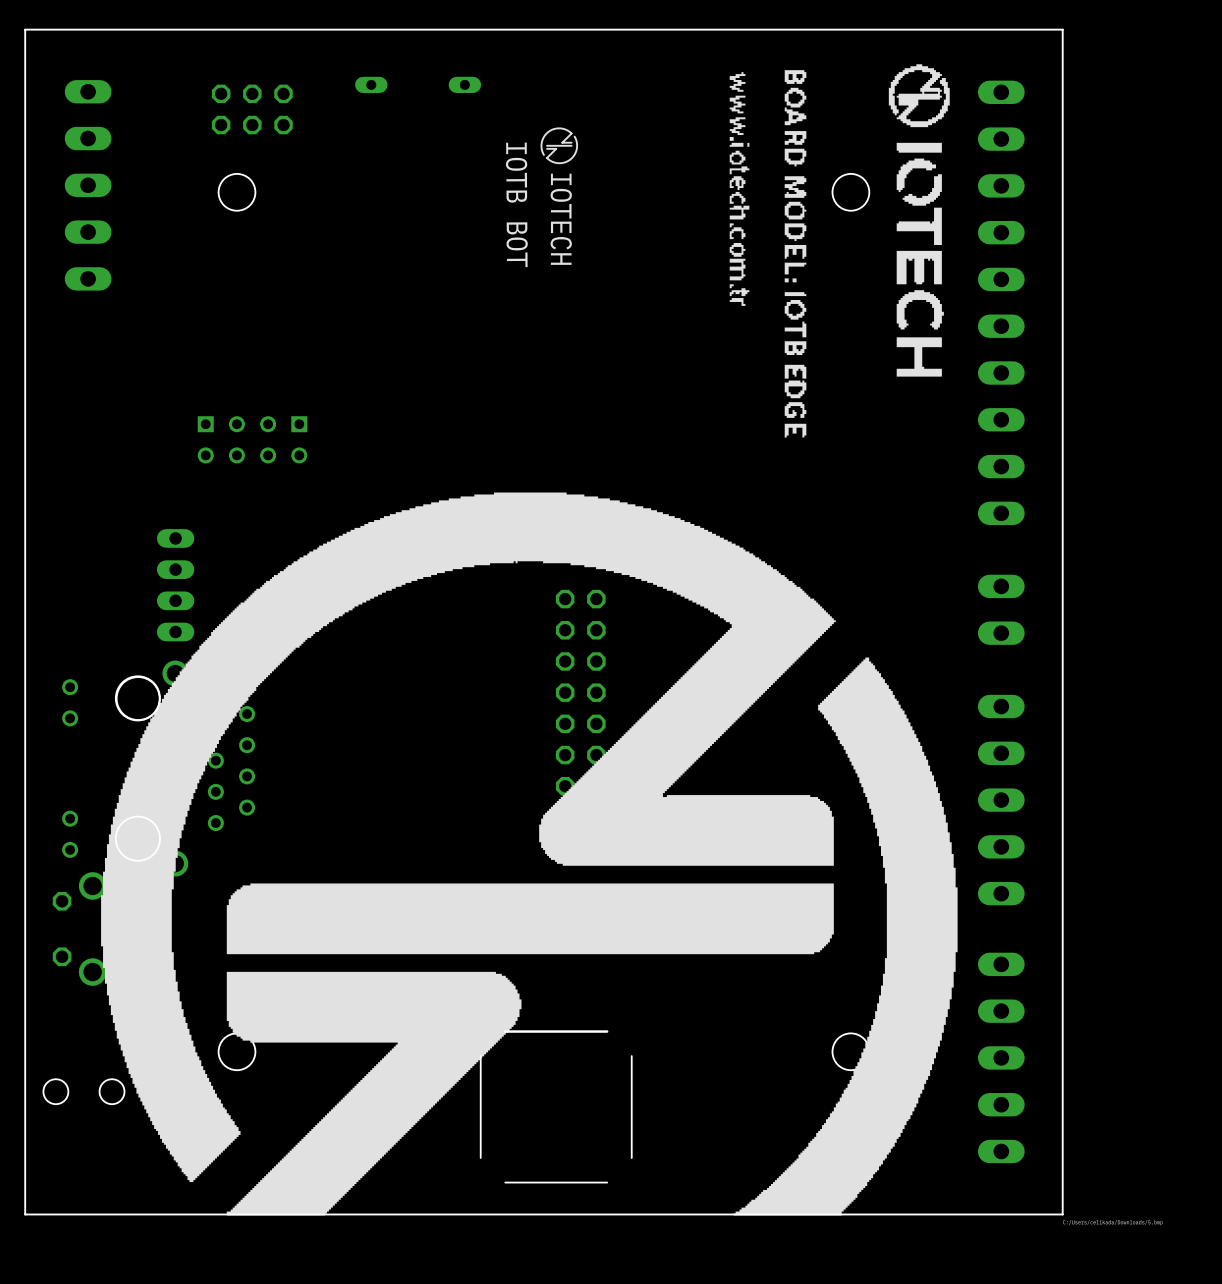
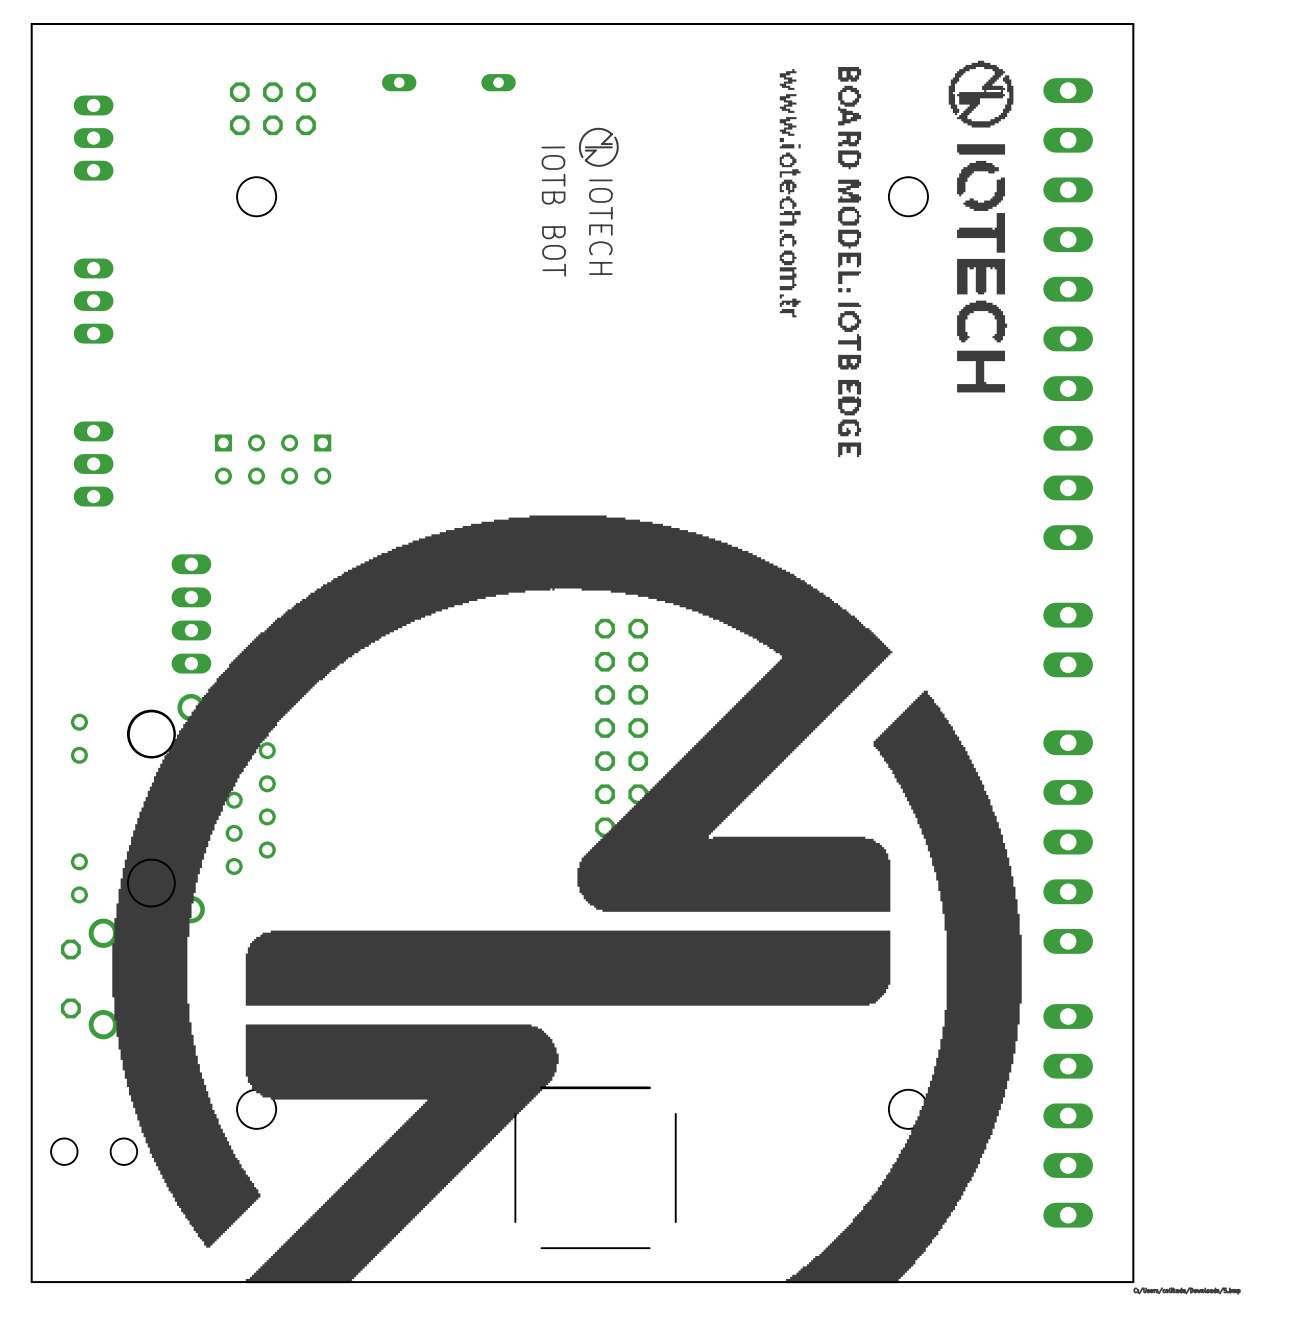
part: none -> (93, 138)
part: (88, 185) -> none
part: none -> (93, 301)
part: none -> (93, 464)

